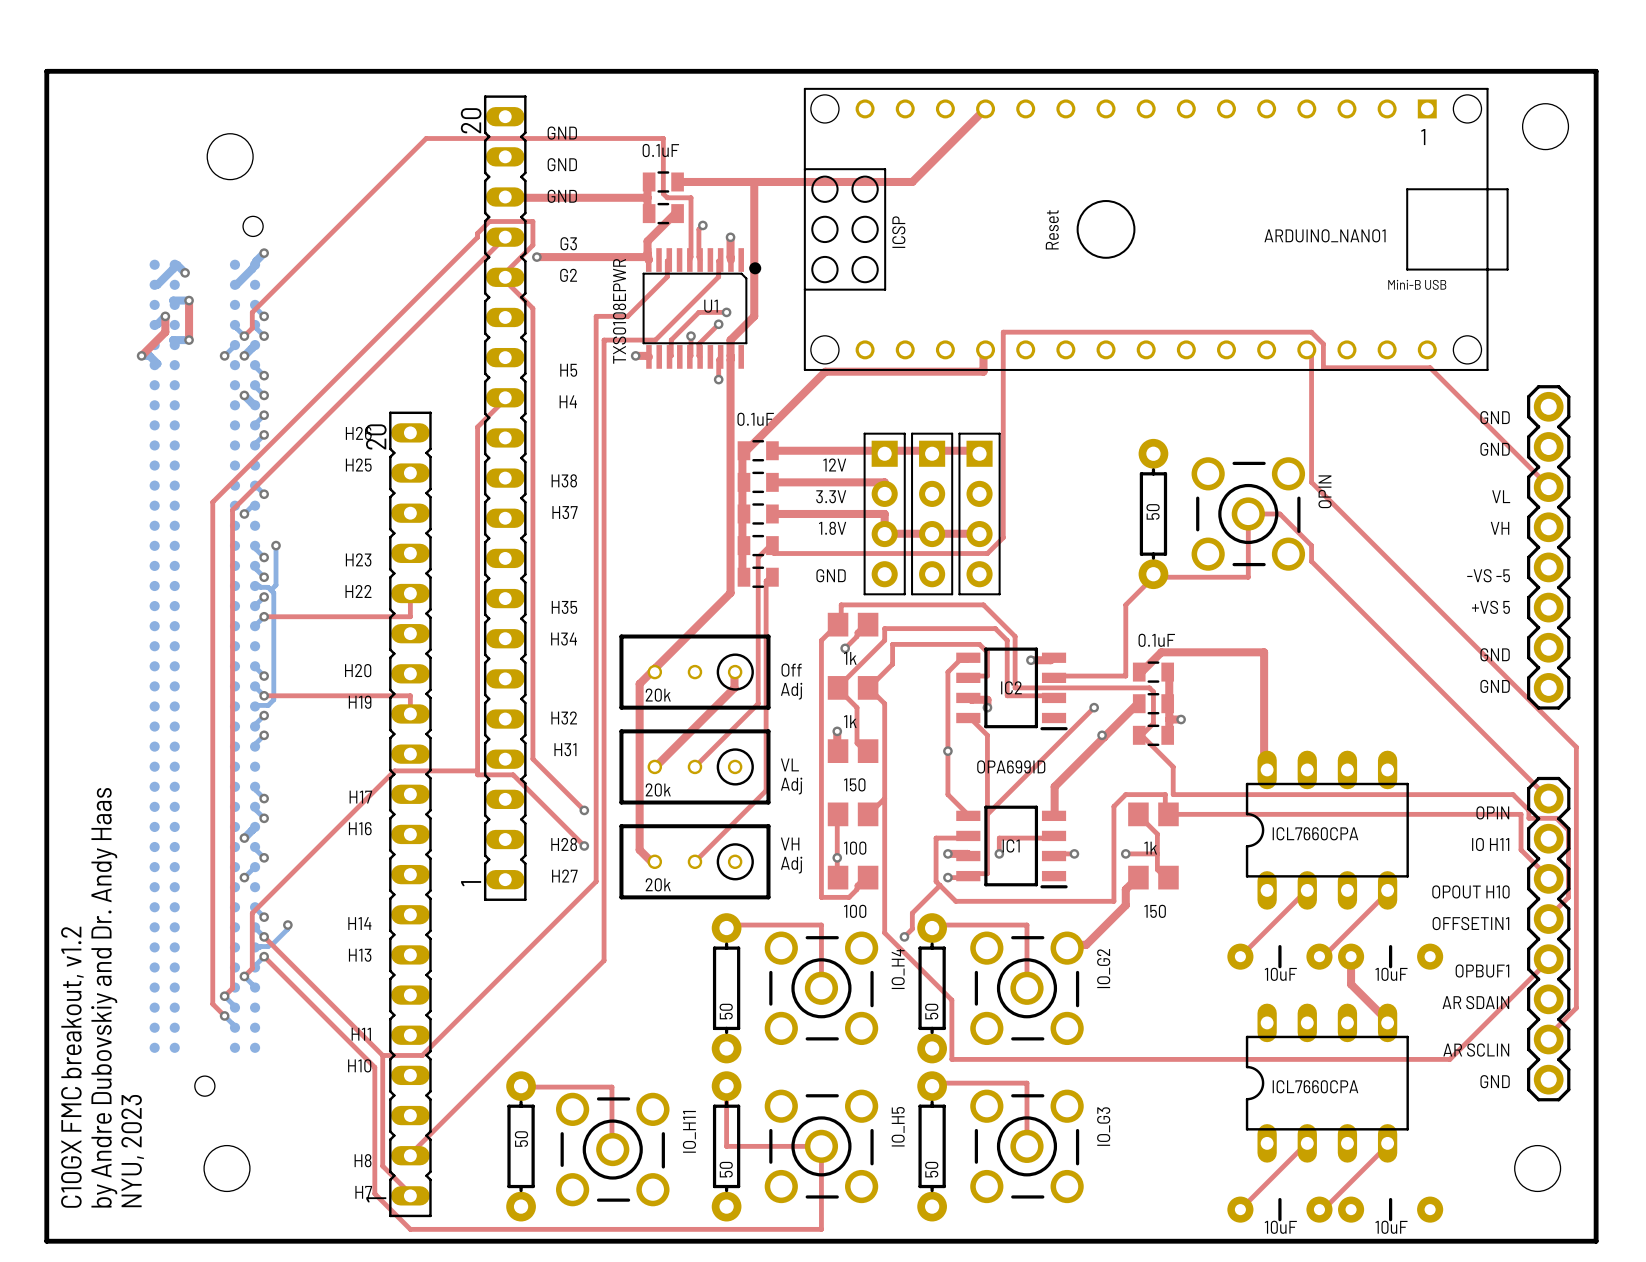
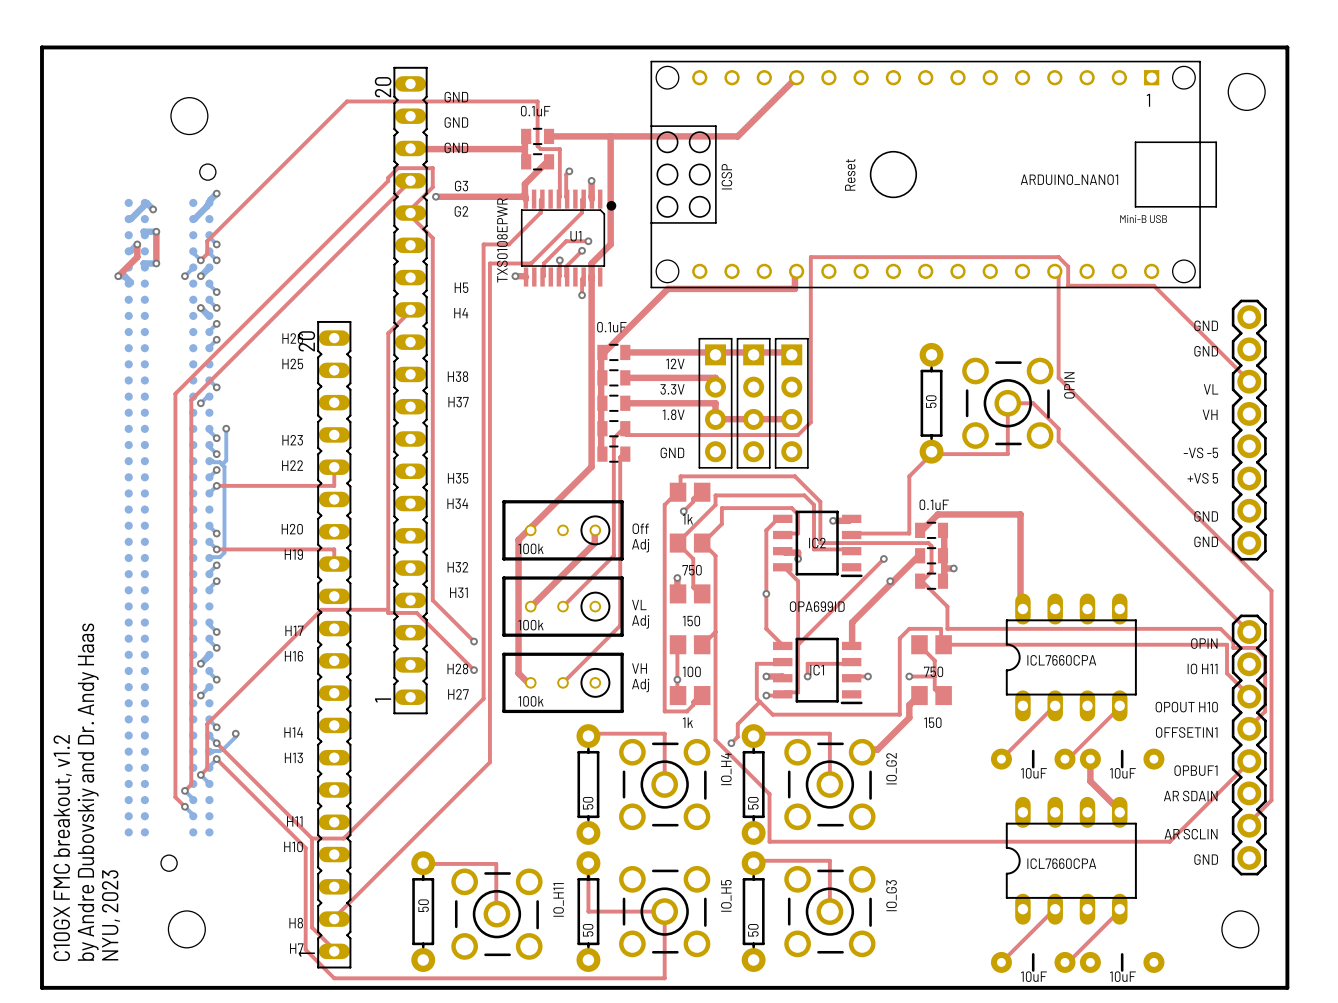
part value: 20k (658, 695) -> 100k (530, 548)
part value: 1k (850, 721) -> 750 (692, 570)
part value: 20k (658, 789) -> 100k (530, 625)
part value: 1k (1150, 848) -> 750 (933, 671)
part value: 20k (658, 884) -> 100k (530, 701)
part value: 100 (855, 911) -> 1k (687, 722)

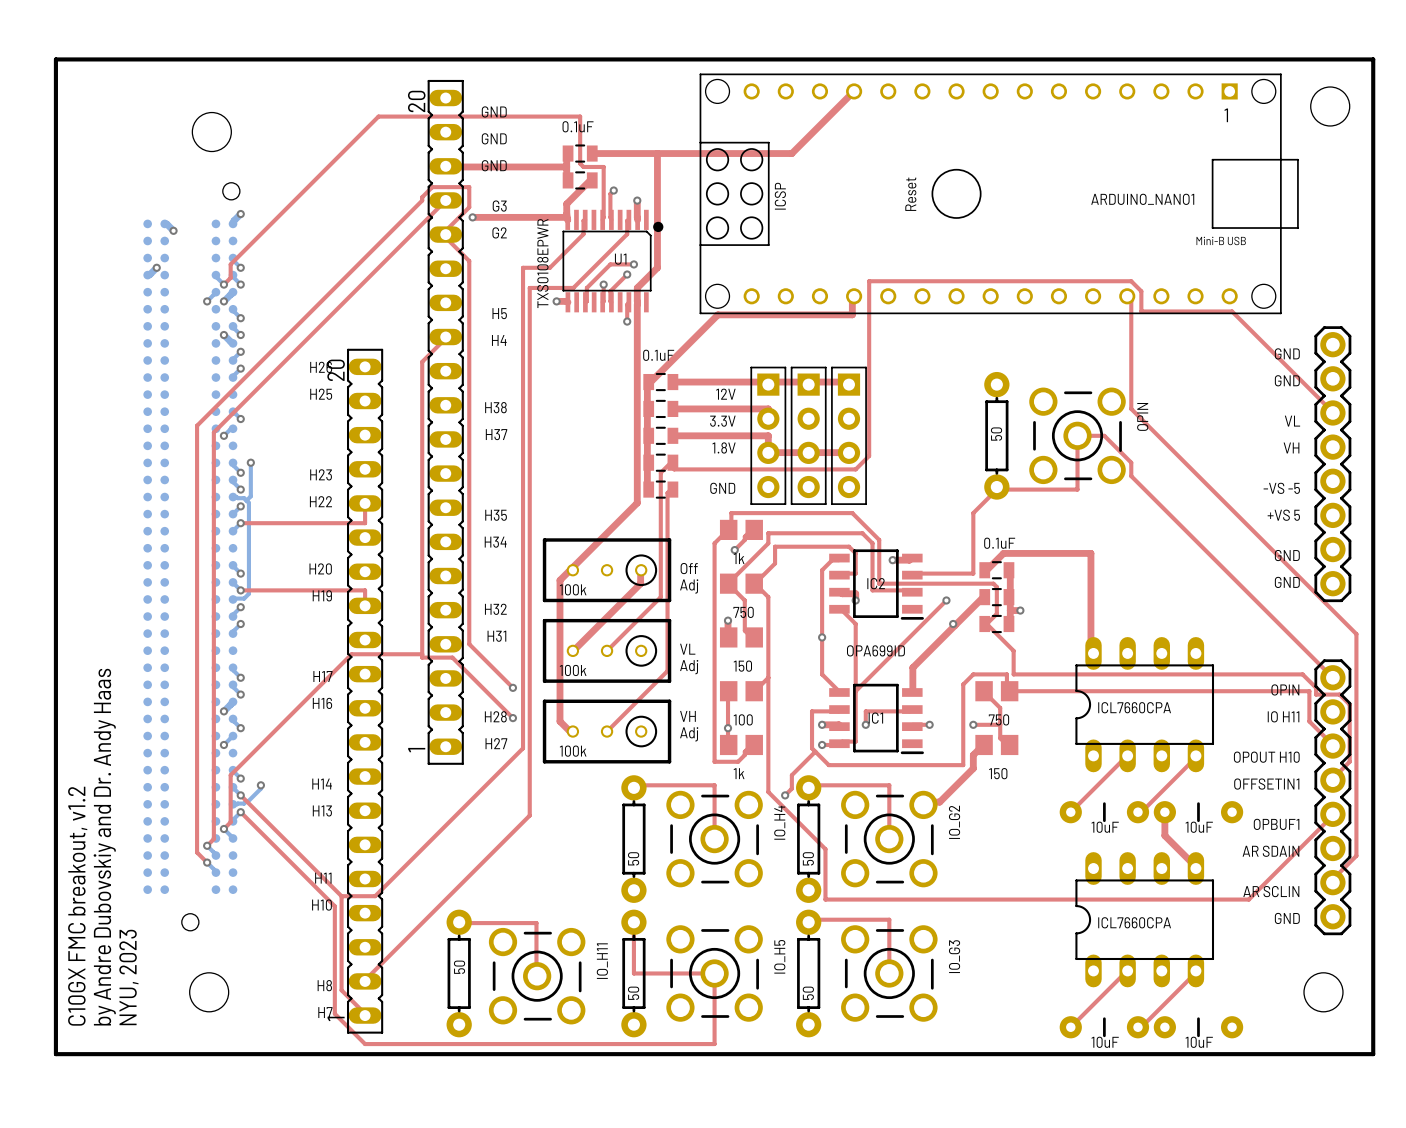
bottom track: (144, 202) (143, 206) (128, 219) -> none
bottom track: (209, 202) (193, 219) -> none
top track: (156, 231) (156, 263) -> none
bottom track: (156, 231) (143, 231) (144, 235) -> none
via: (156, 231) -> none
top track: (137, 244) (137, 257) (118, 276) -> none
bottom track: (156, 263) (143, 263) (144, 267) -> none
via: (156, 263) -> none
bottom track: (118, 276) (124, 276) (130, 282) (128, 283) -> none
via: (118, 276) -> none

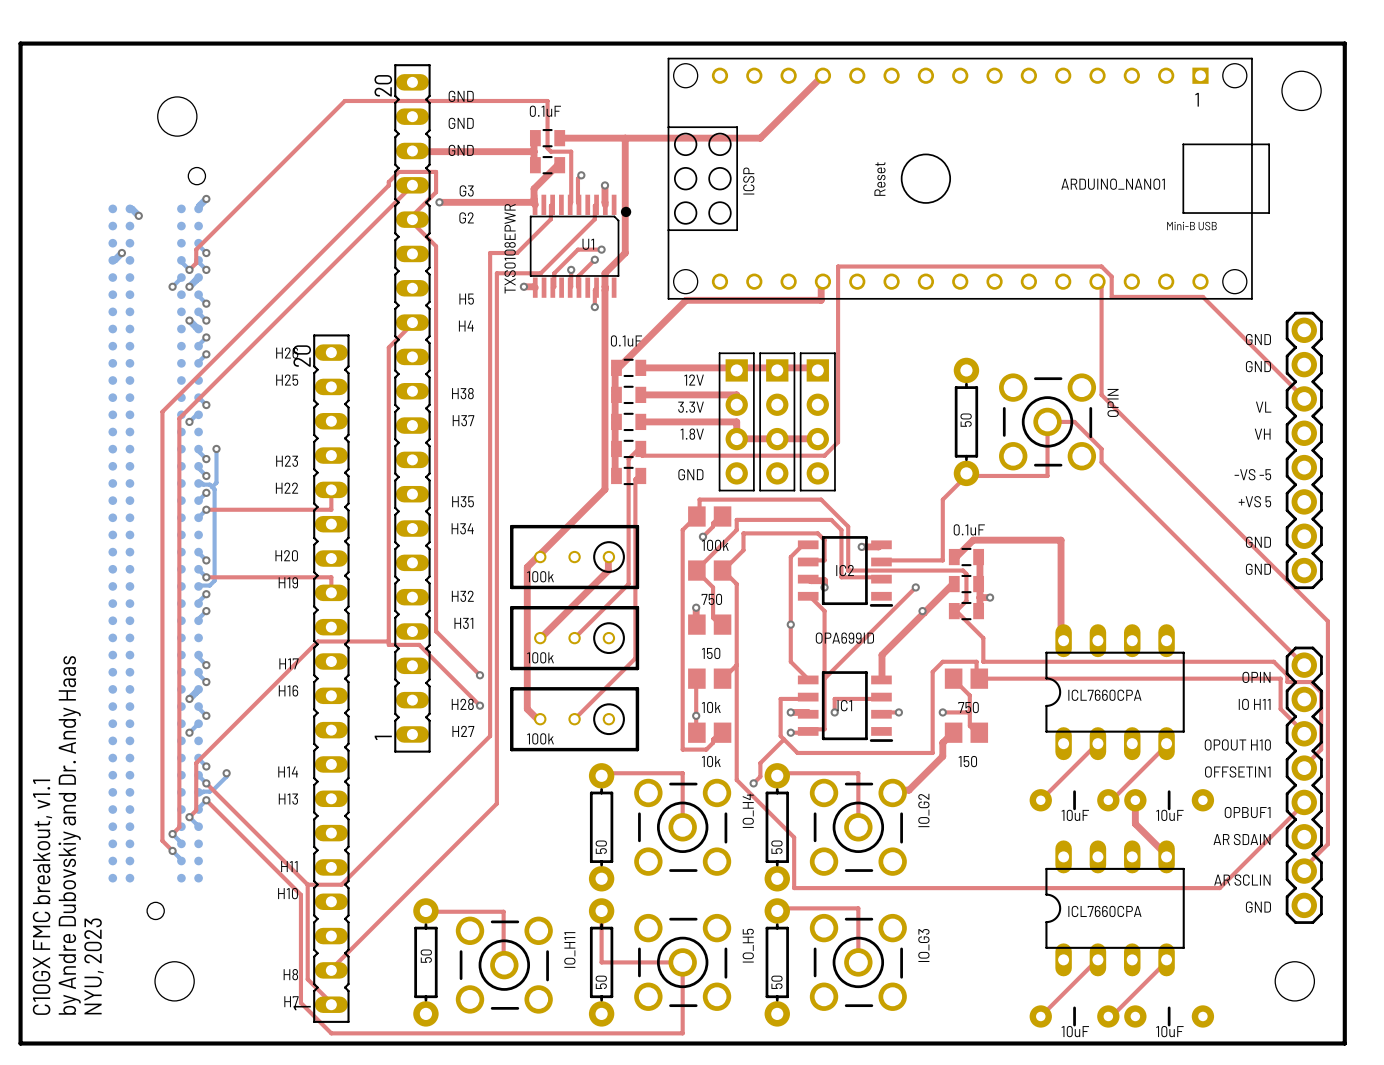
part value: 1k (739, 558) -> 100k (715, 545)
text: Off (689, 568) -> none
text: Adj (689, 586) -> none
text: VL (687, 649) -> none
text: Adj (689, 667) -> none
text: VH (687, 716) -> none
part value: 100 (743, 719) -> 10k (711, 707)
text: Adj (689, 734) -> none
part value: 1k (739, 773) -> 10k (711, 761)
text: C10GX FMC breakout, v1.2 (77, 906) -> C10GX FMC breakout, v1.1 (42, 897)

